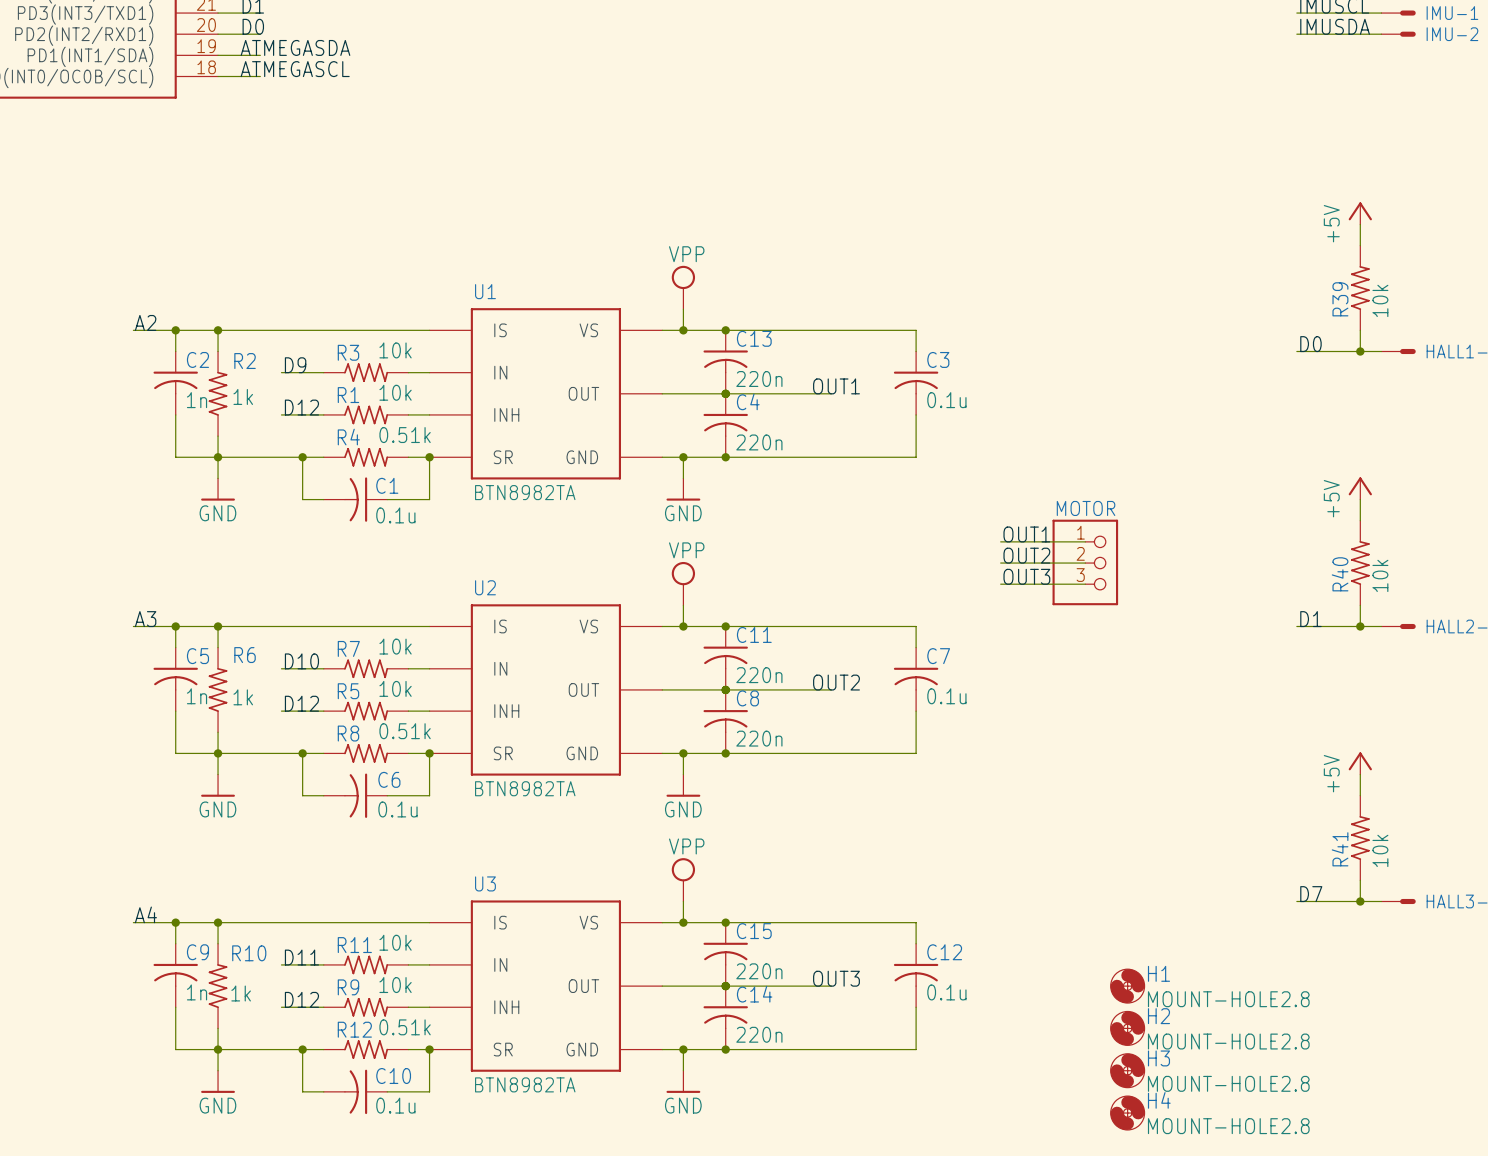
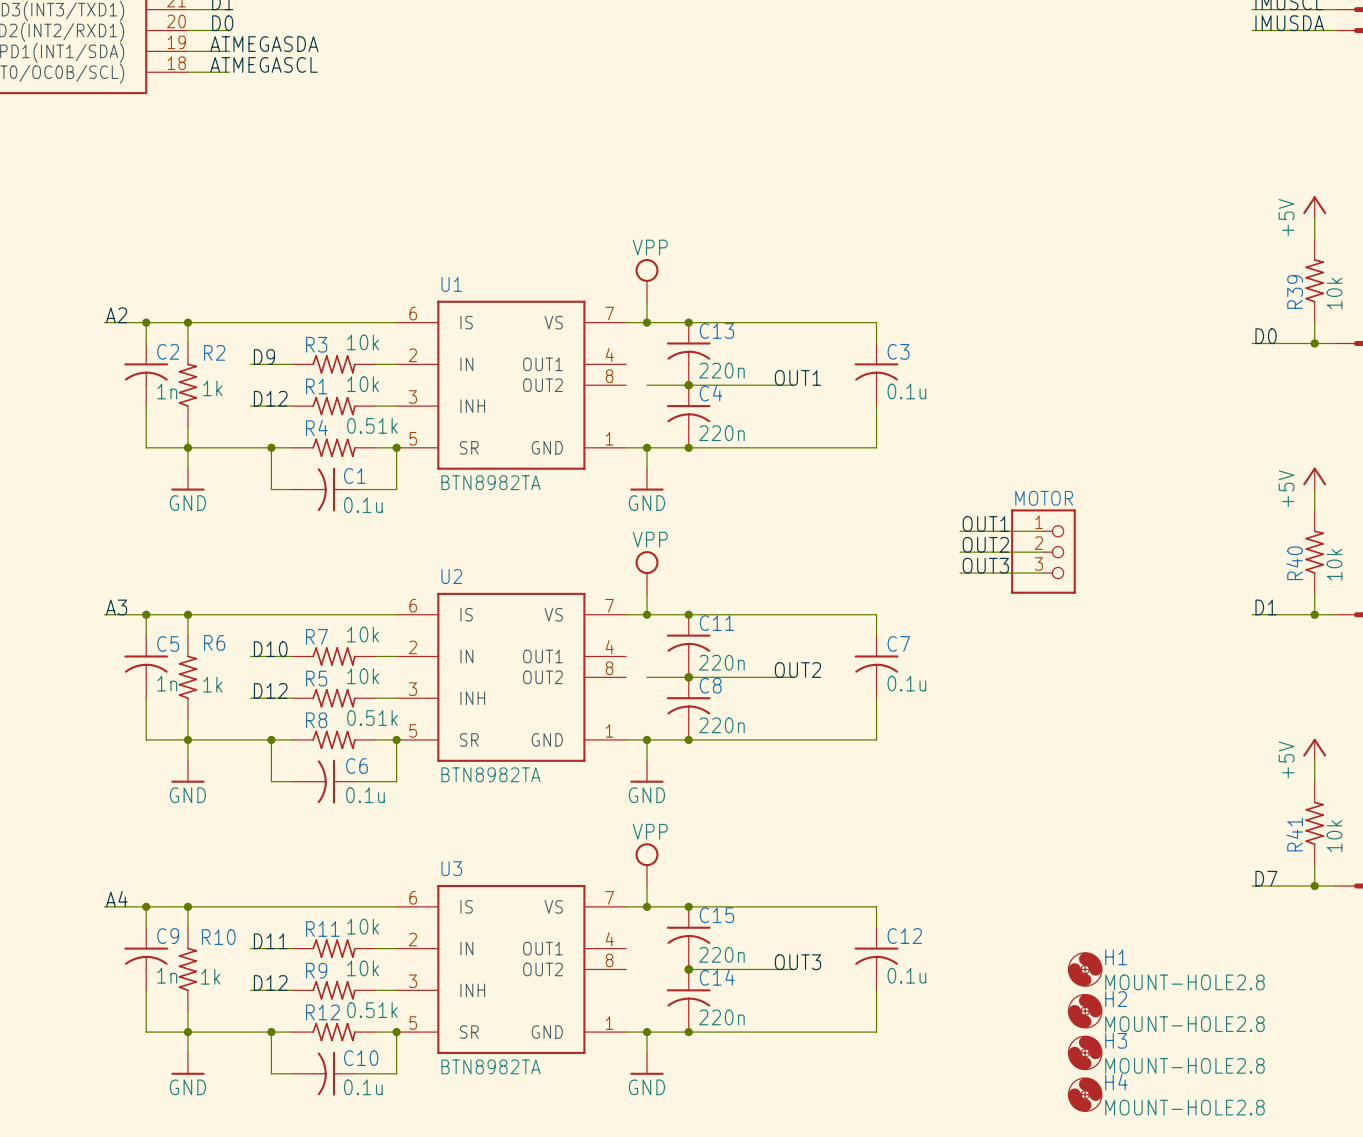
U1 symbol: [429, 308, 663, 480] -> [396, 300, 627, 470]
wire: (662, 393) (683, 393) -> none
U2 symbol: [429, 604, 663, 776] -> [396, 592, 627, 762]
wire: (662, 689) (683, 689) -> none
U3 symbol: [429, 900, 663, 1072] -> [396, 884, 627, 1054]
wire: (662, 986) (725, 986) -> none

